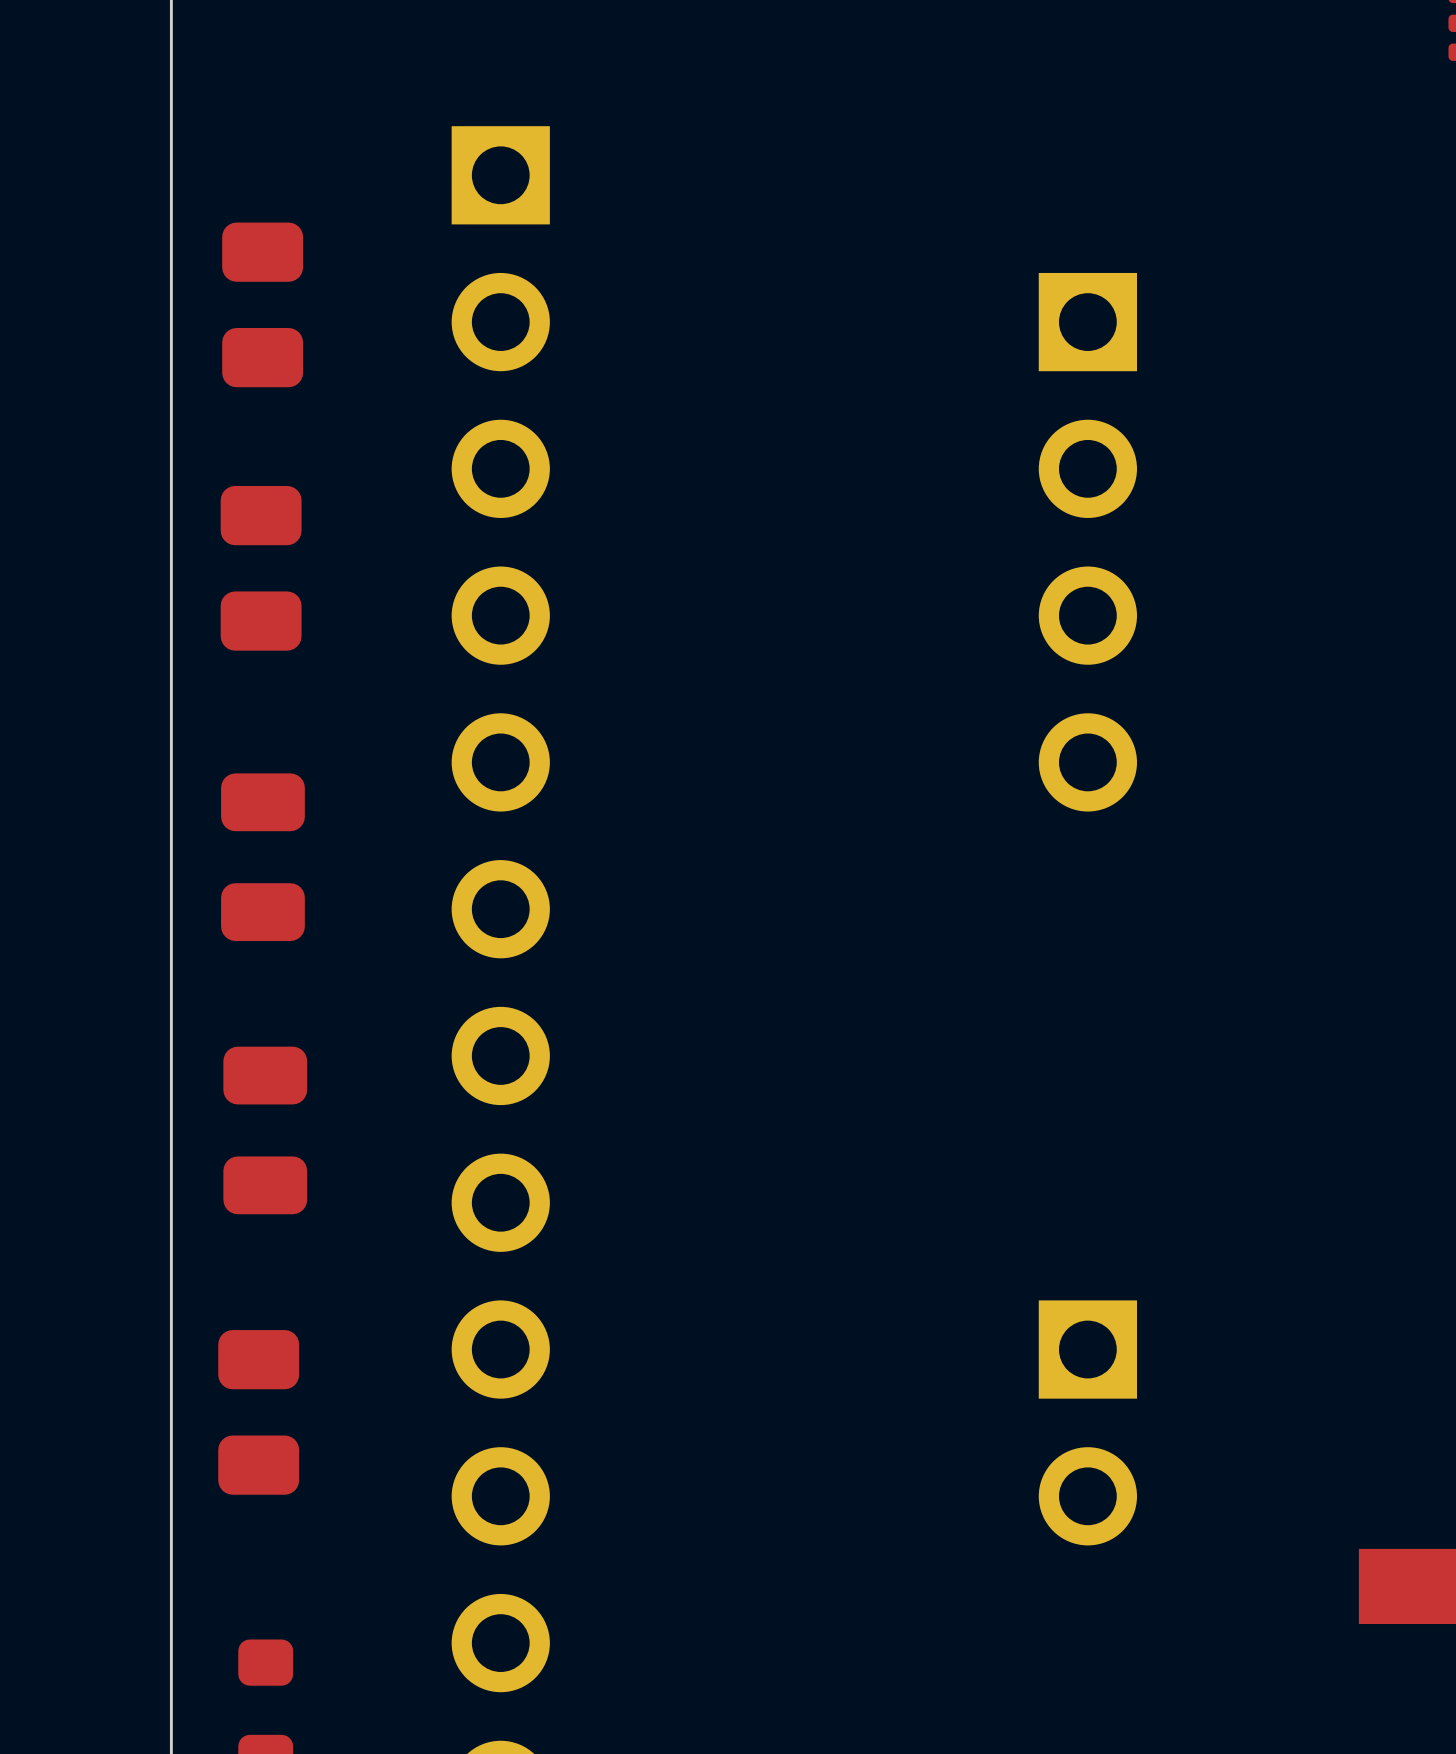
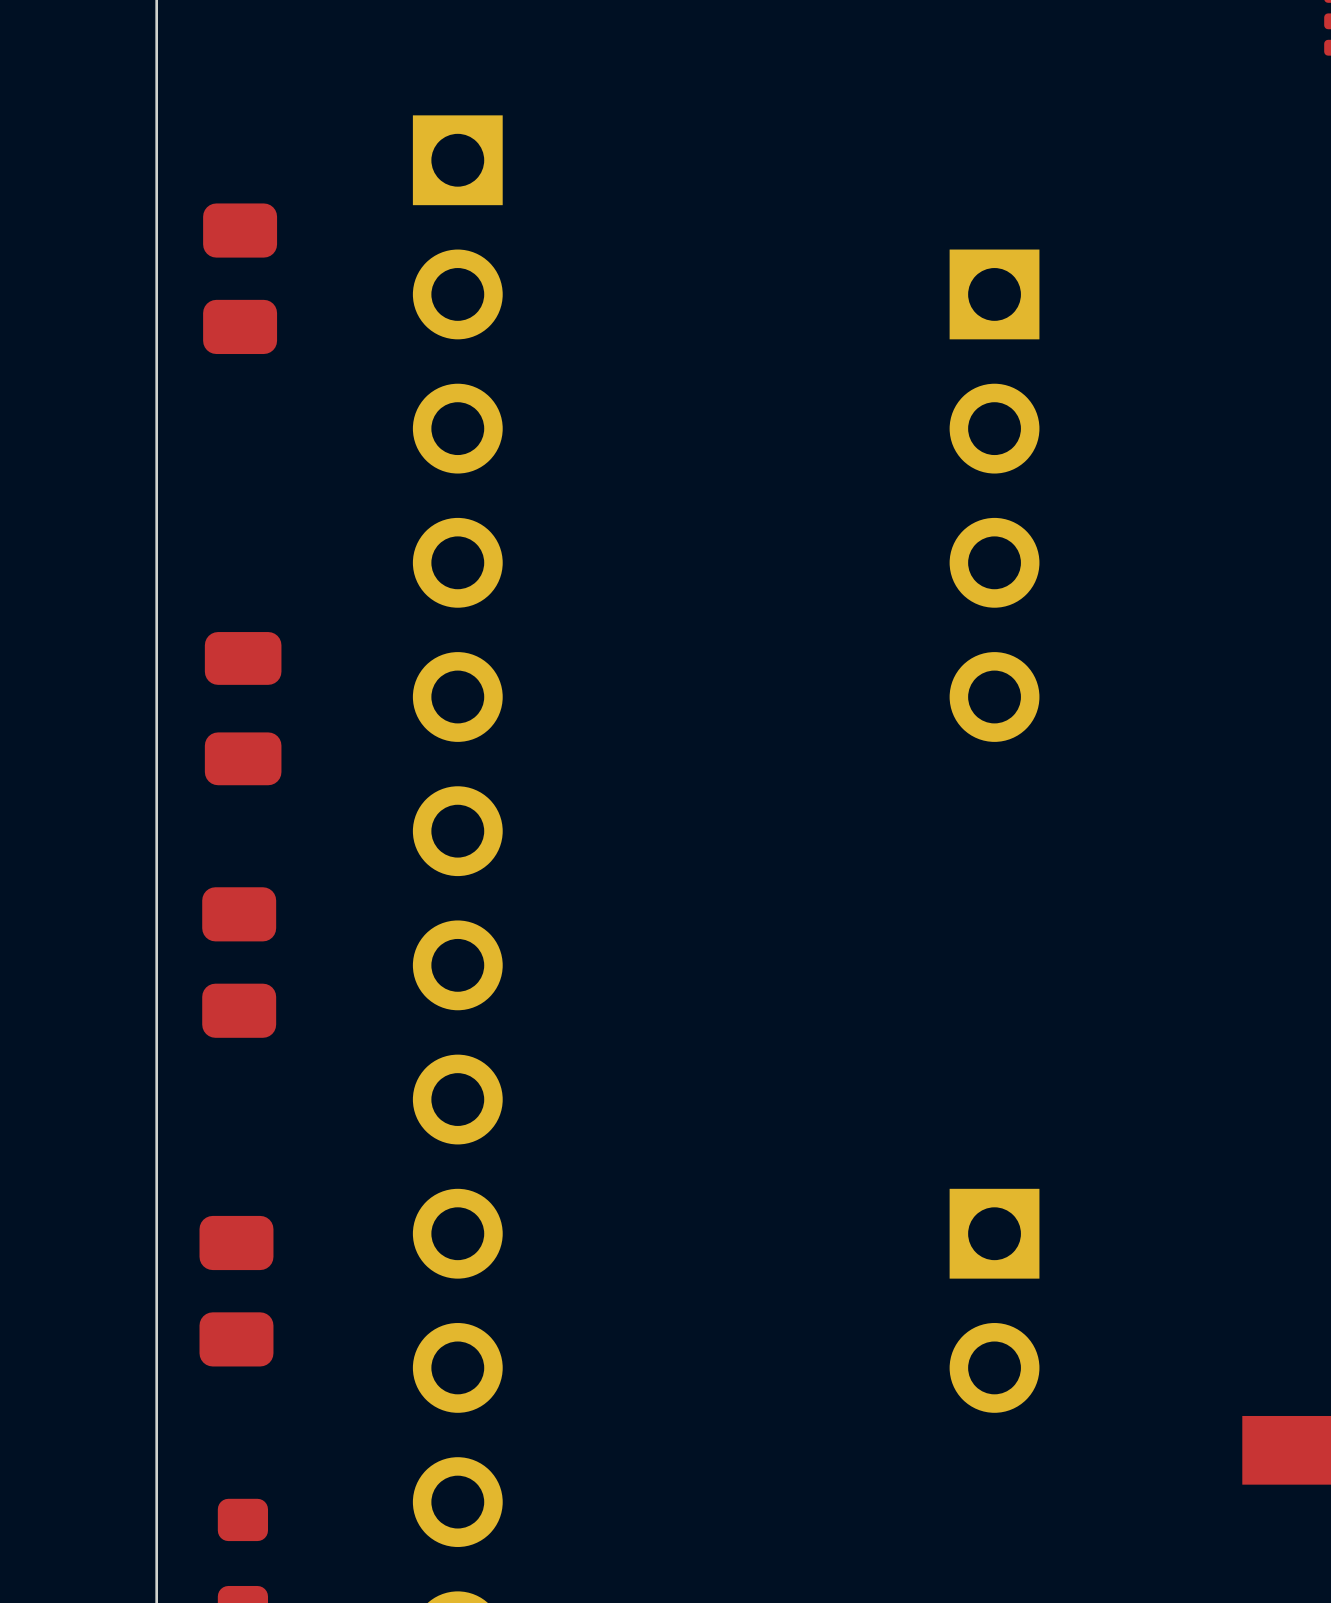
part position: (261, 568) -> (239, 962)
part position: (262, 857) -> (243, 708)
part: (265, 1130) -> none

